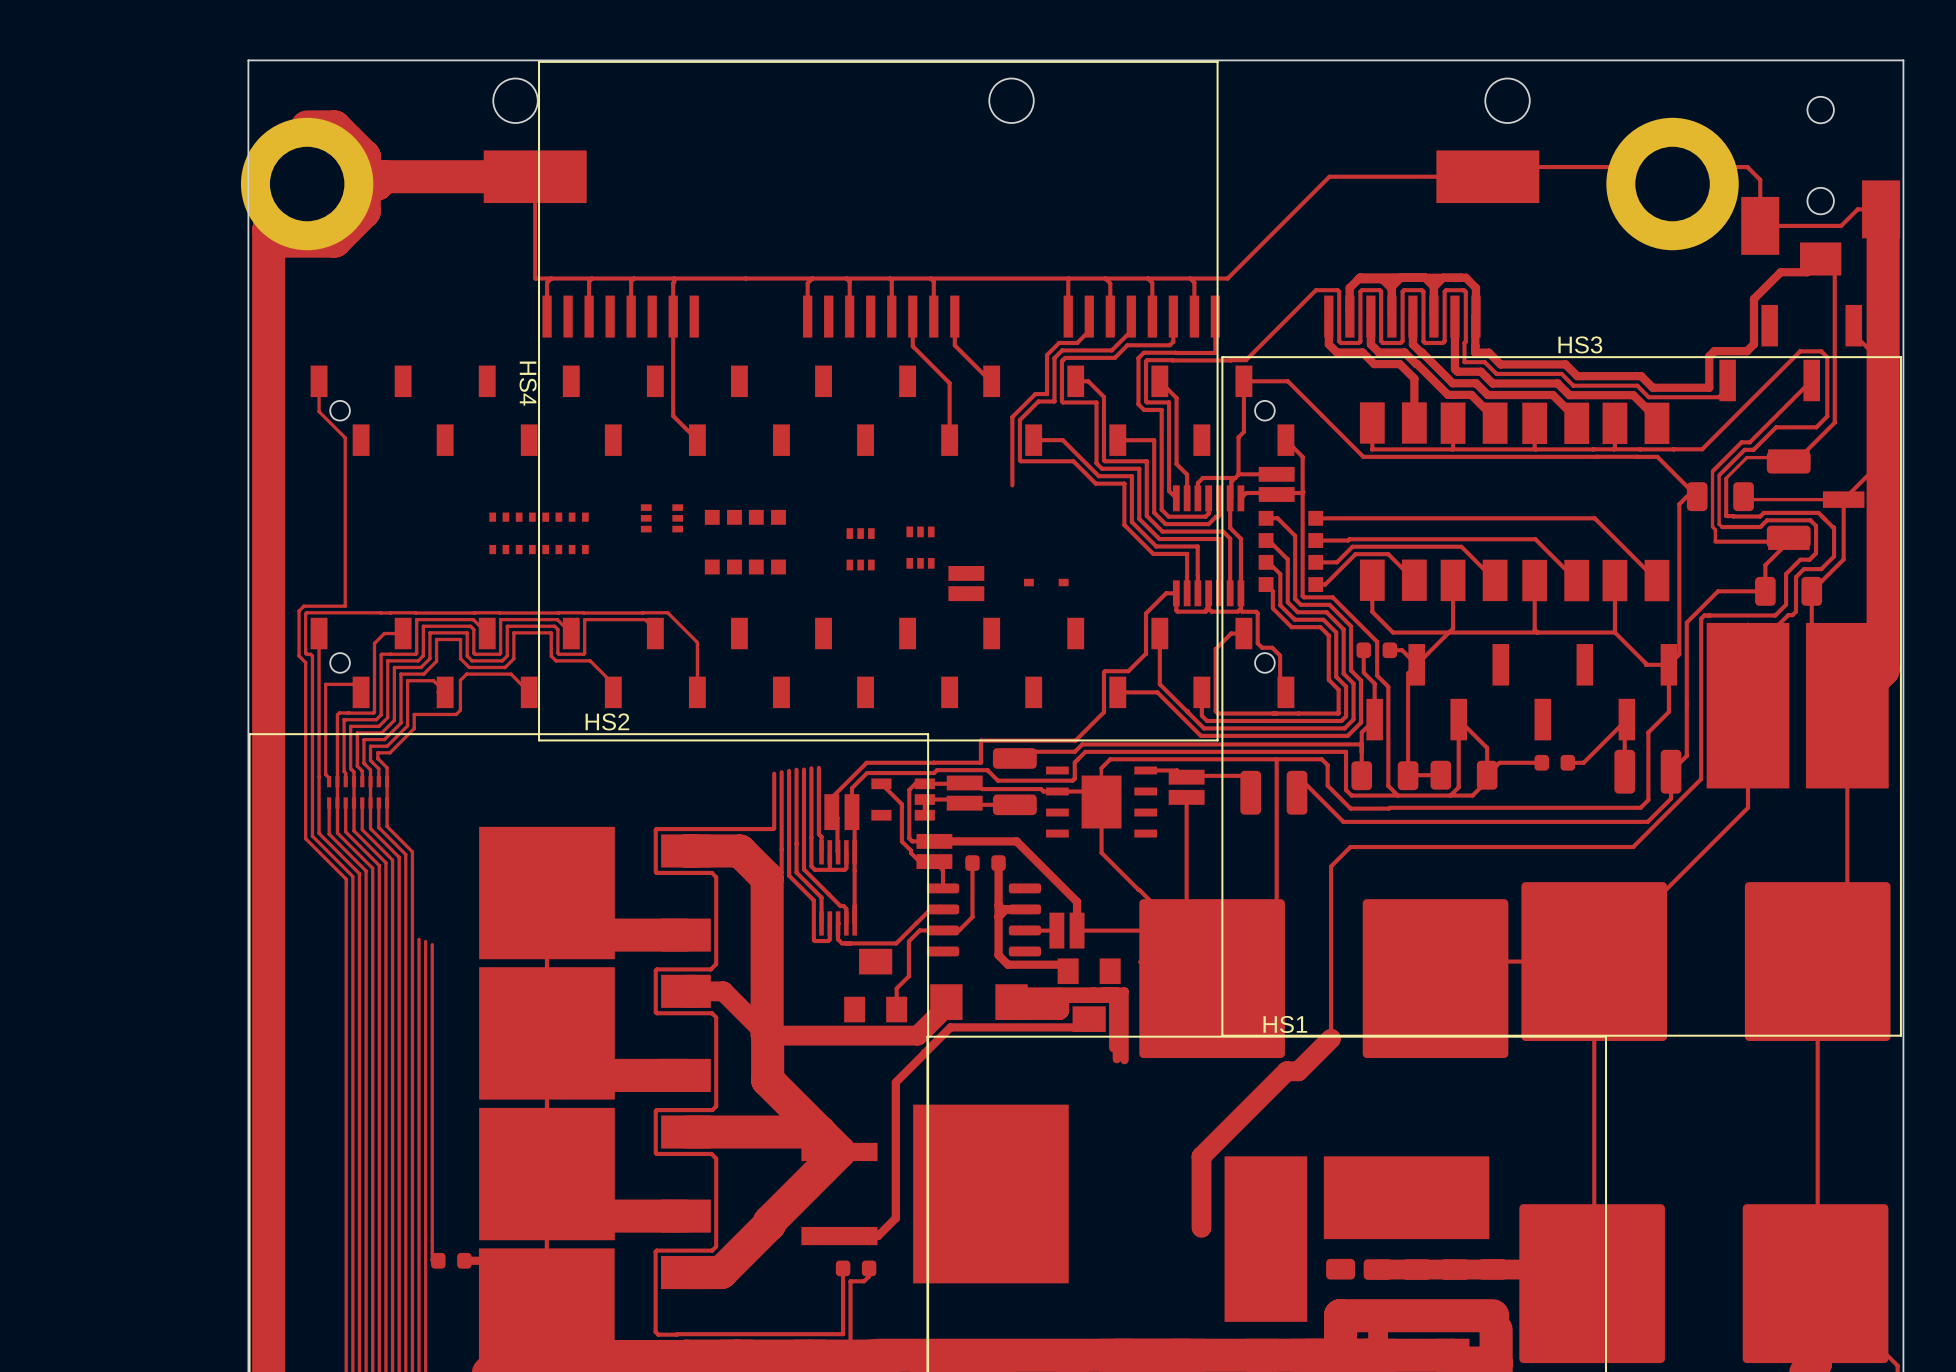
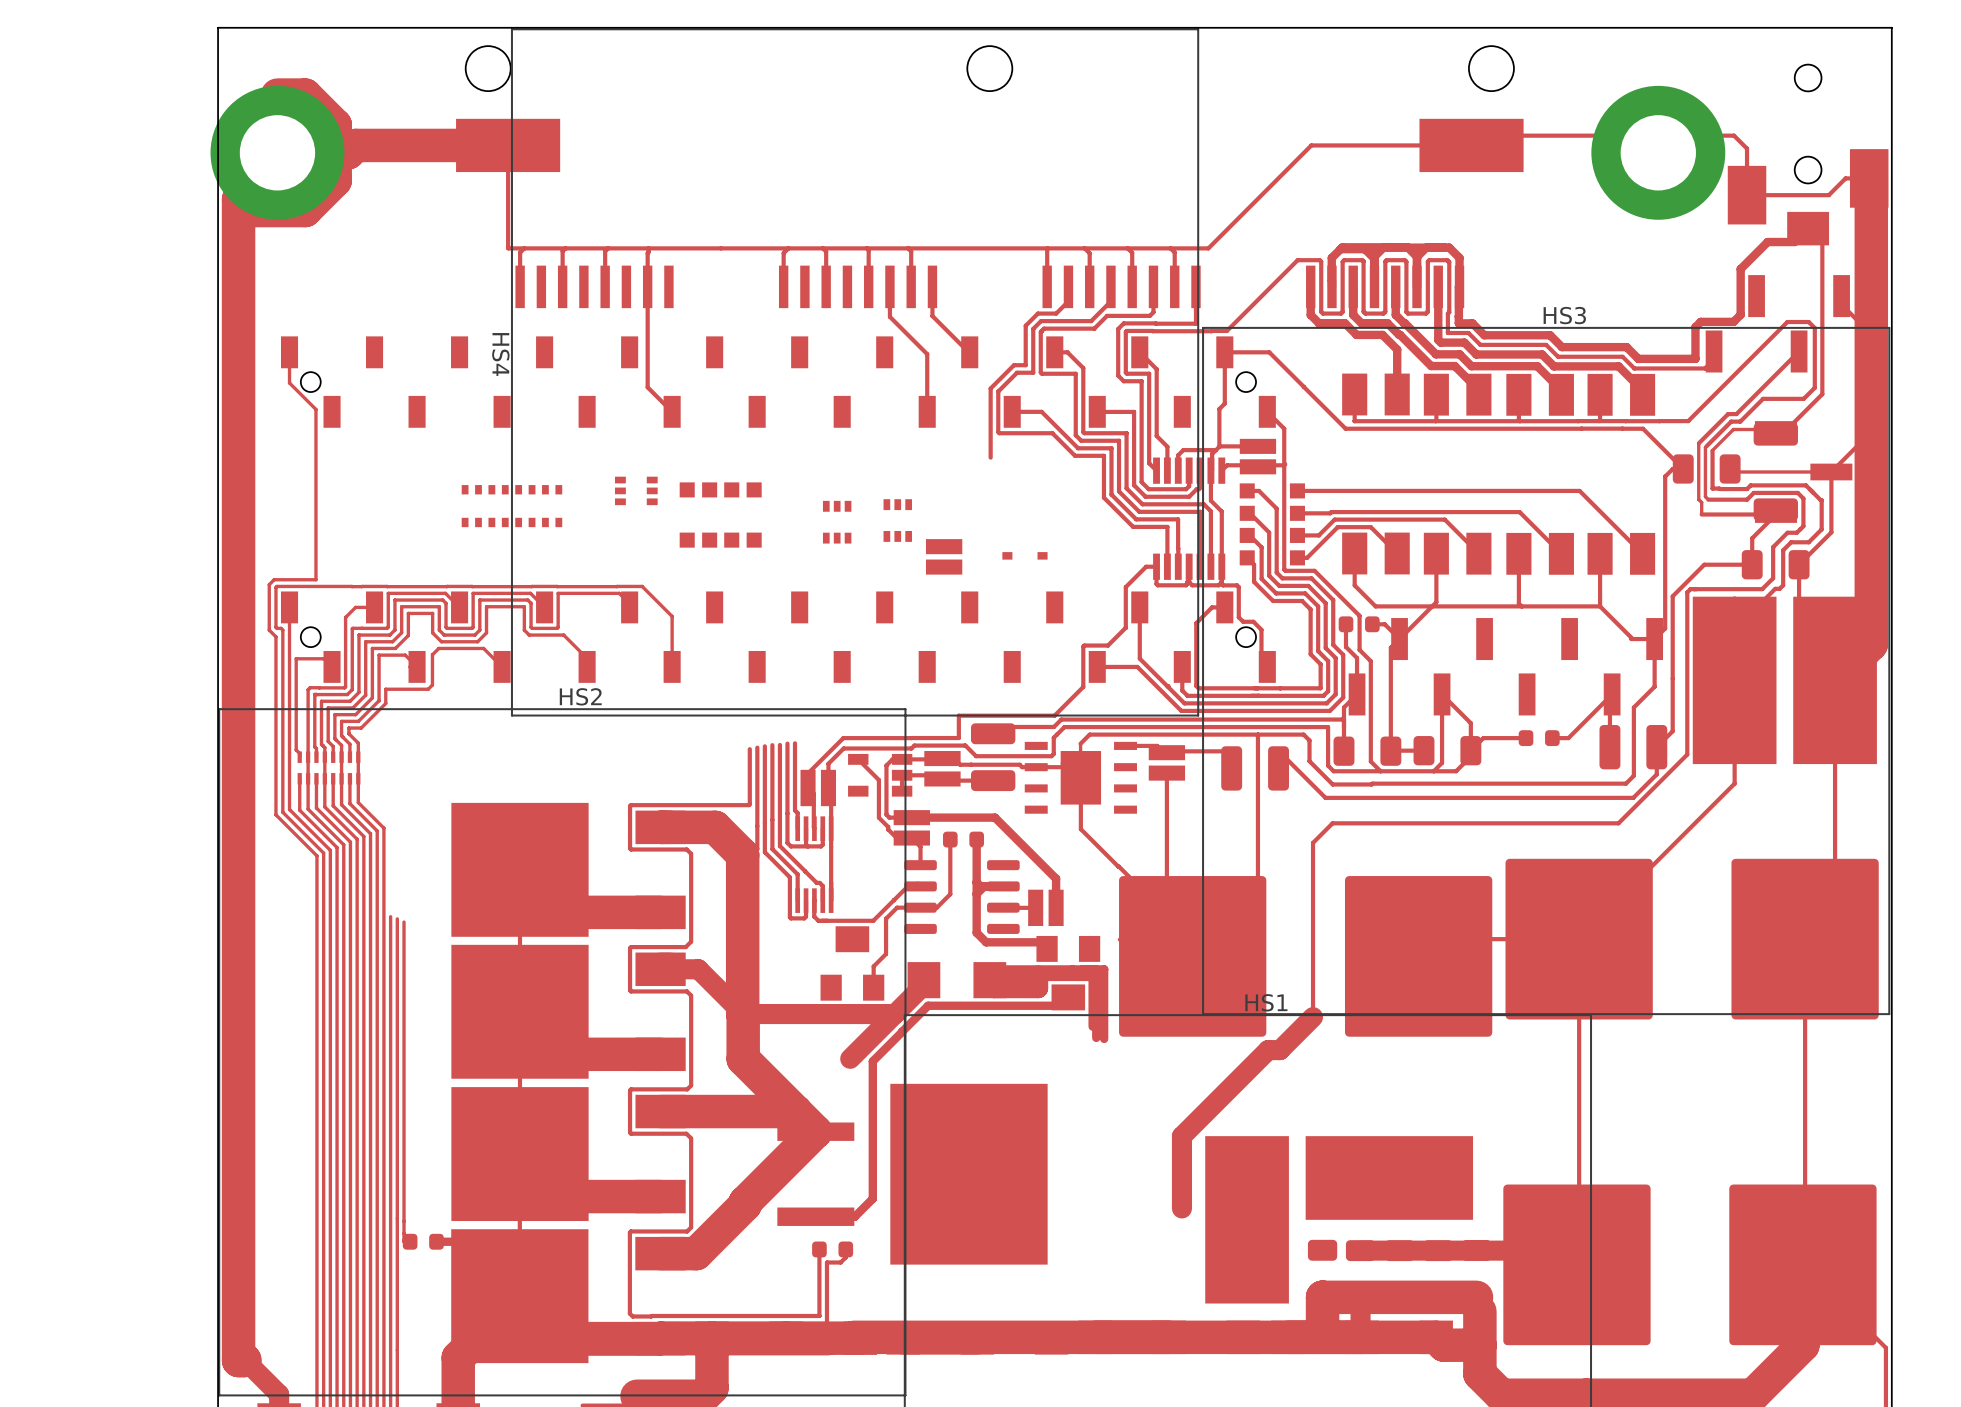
top track: (1168, 930) (1077, 930) -> none
top track: none -> (895, 1014) (850, 1058)

